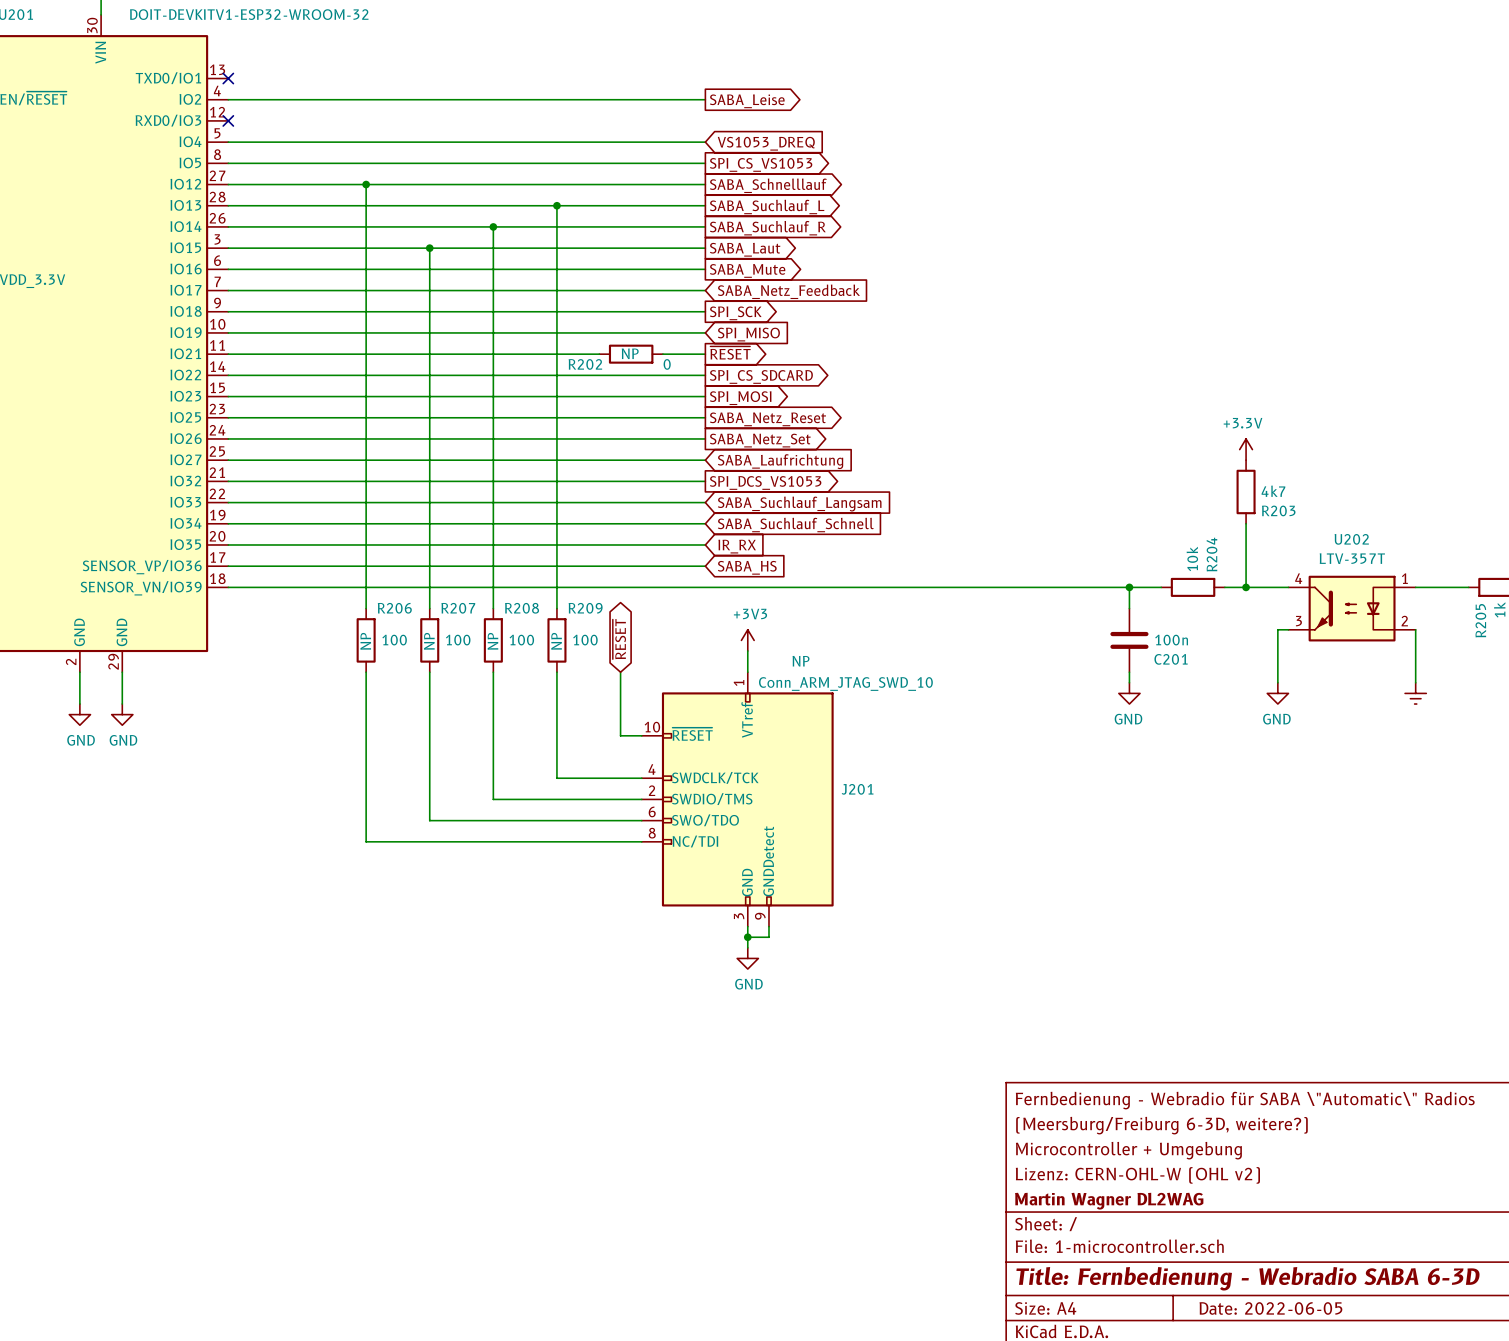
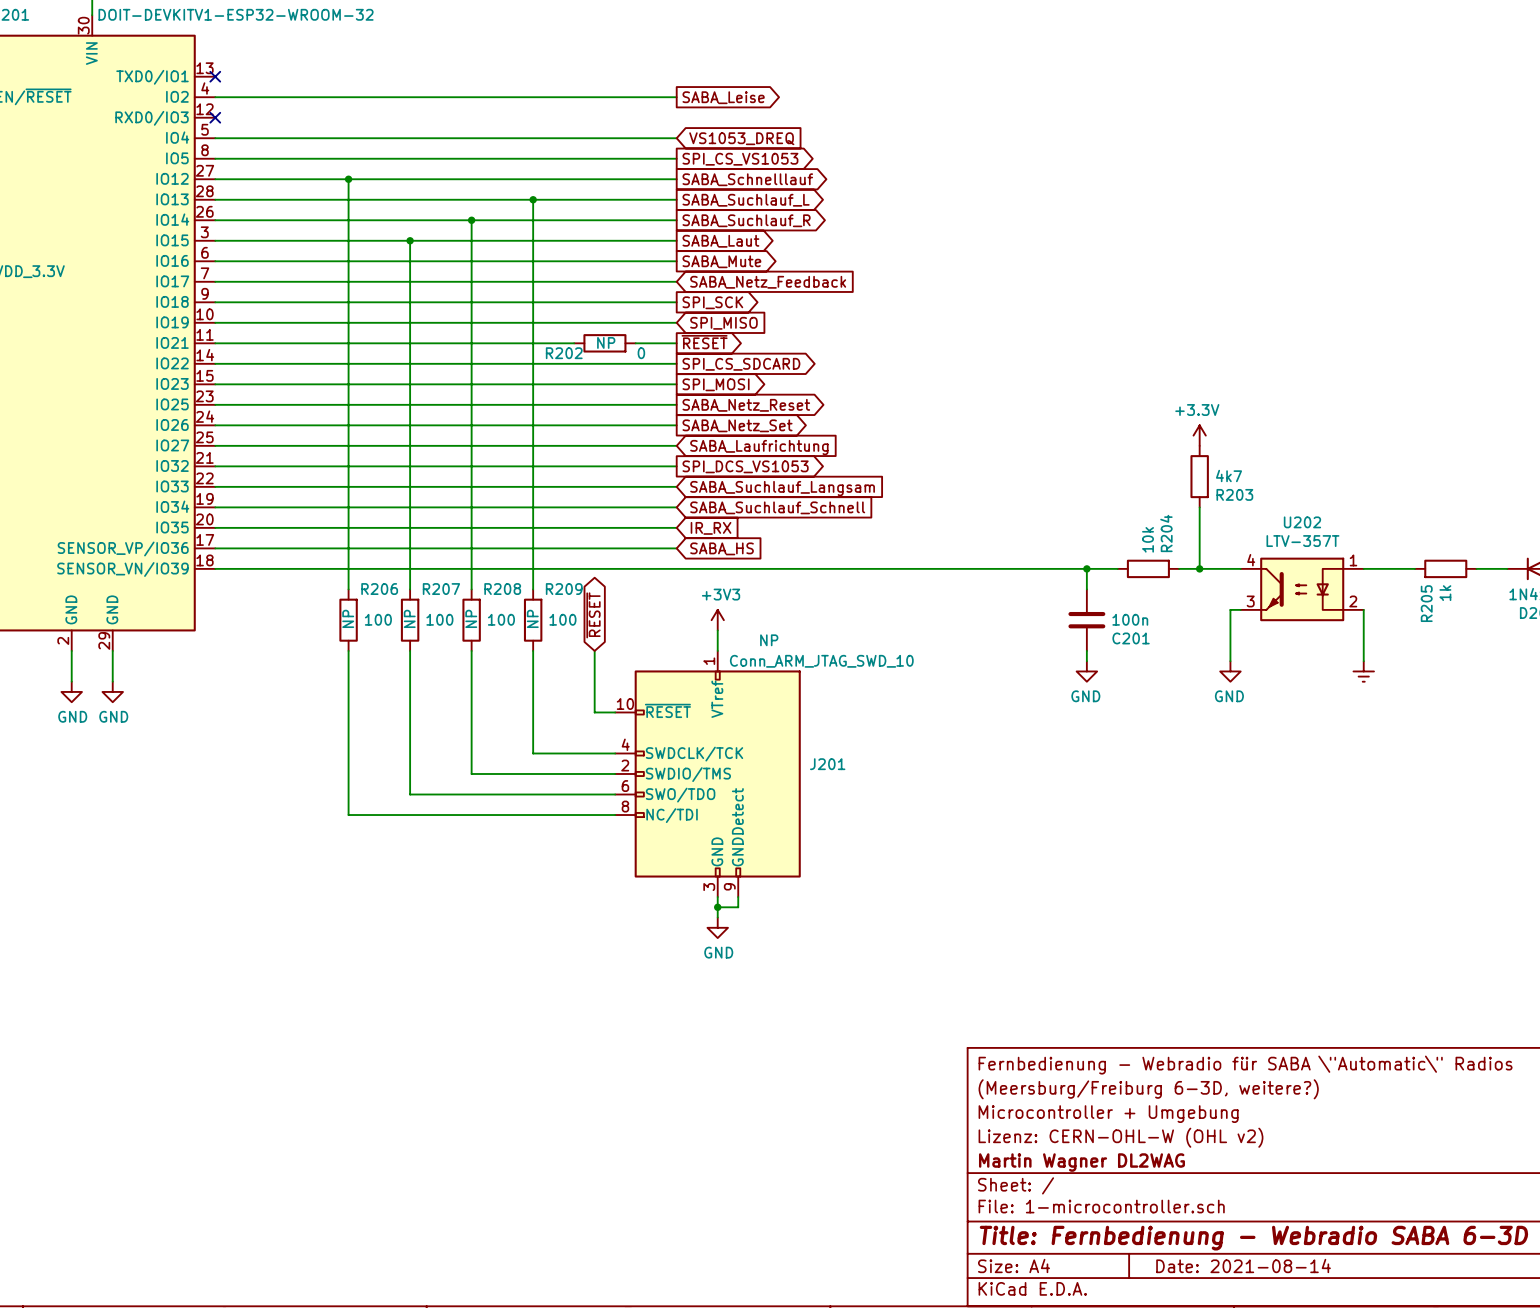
title block: Date: 2022-06-05 (1270, 1308) -> Date: 2021-08-14 (1243, 1265)

